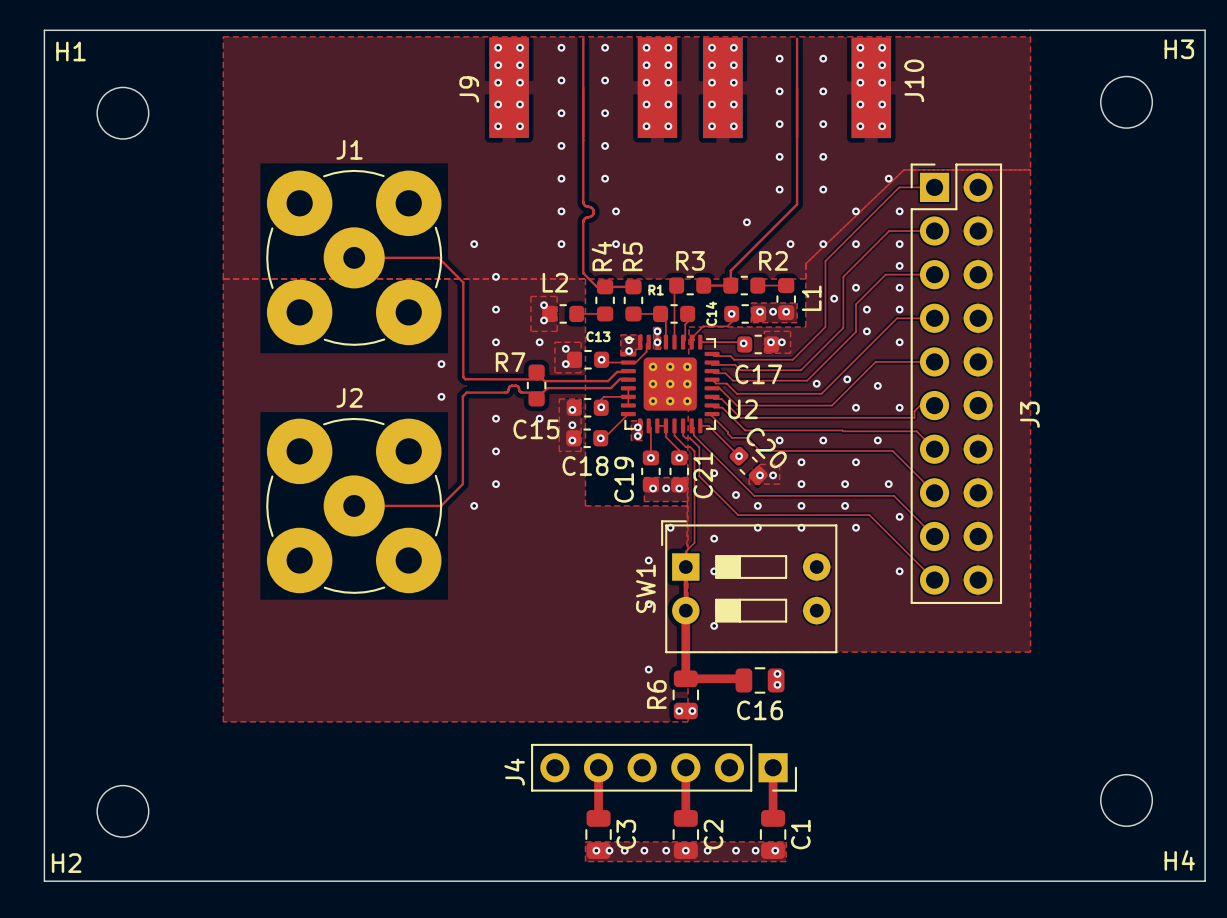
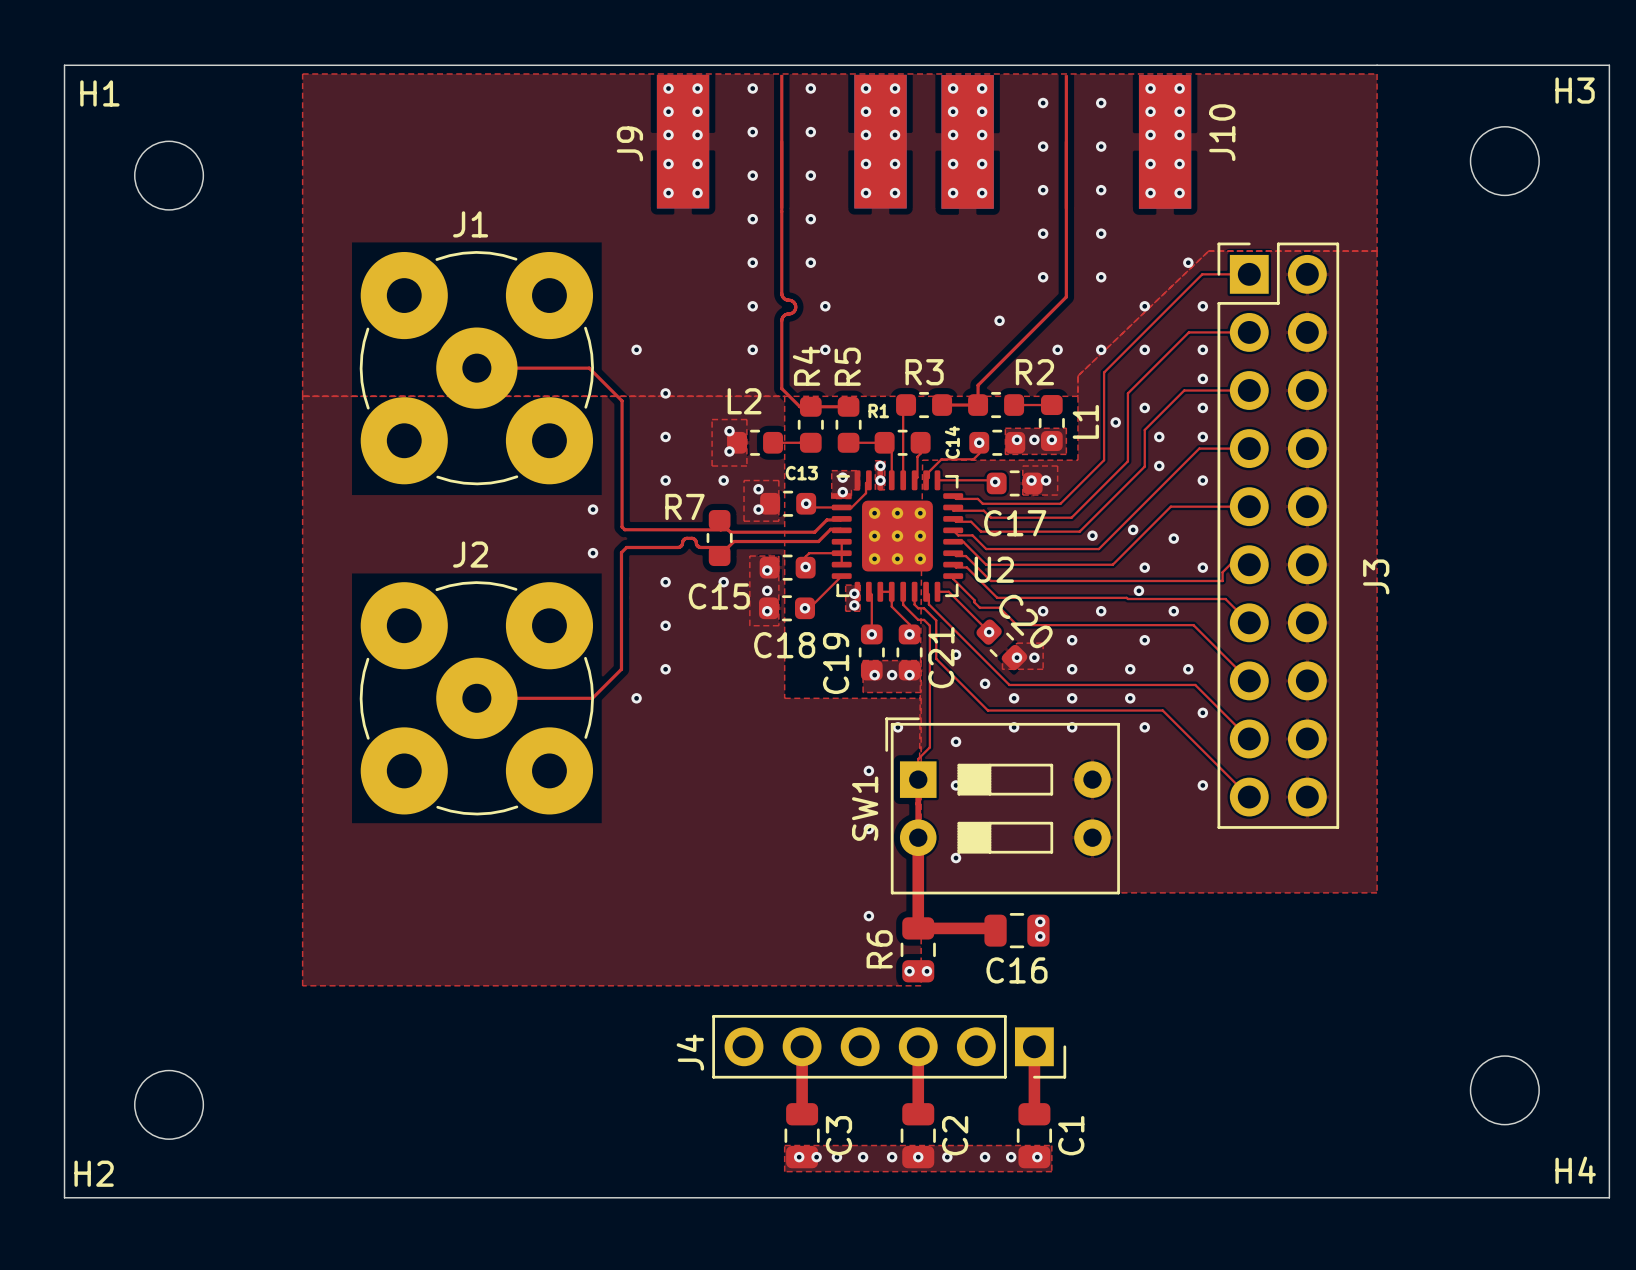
via: none -> (1138, 590)

